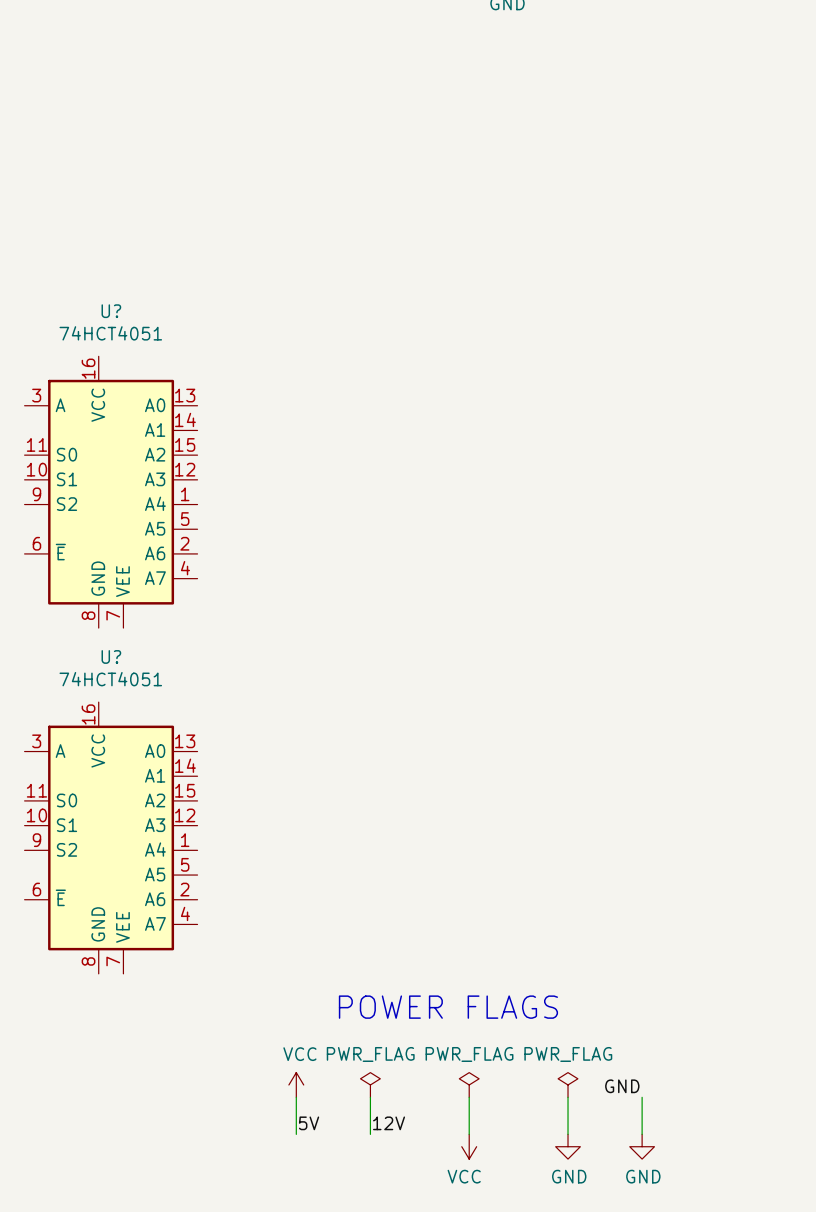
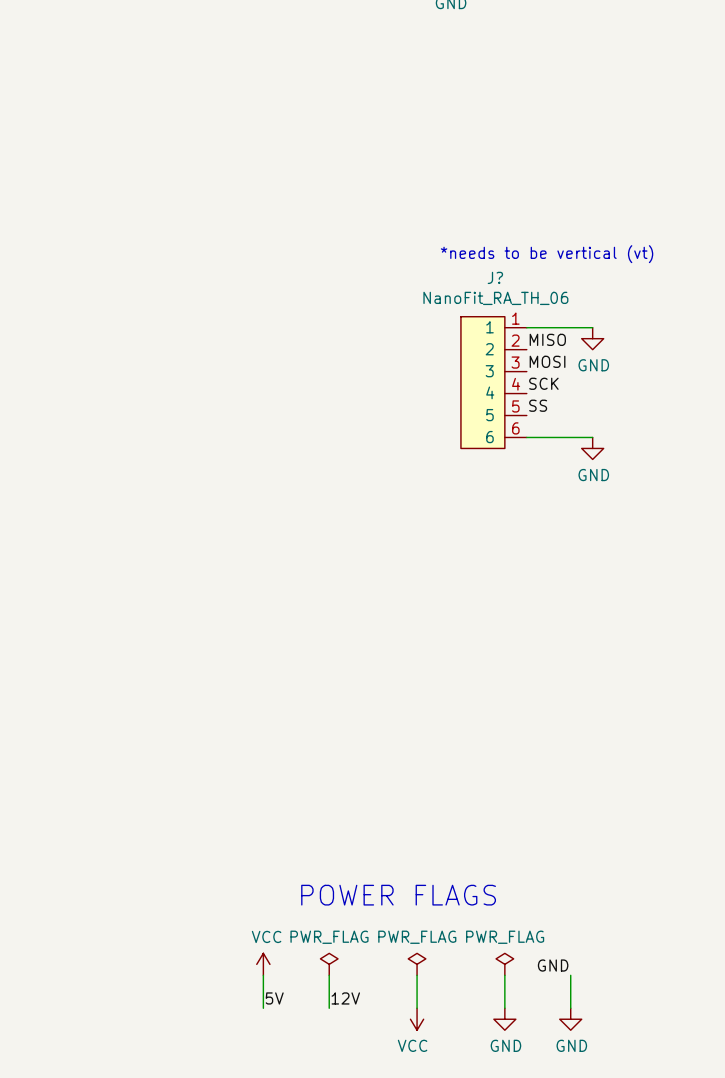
text: none -> *needs to be vertical (vt) (547, 254)
wire: none -> (526, 327) (592, 327)
power symbol: none -> GND (592, 338)
label: none -> MISO (547, 339)
label: none -> MOSI (547, 361)
J?: none -> NanoFit_RA_TH_06 (493, 382)
label: none -> SCK (543, 383)
label: none -> SS (538, 405)
U?: 74HCT4051 (111, 492) -> none
wire: none -> (526, 437) (592, 437)
power symbol: none -> GND (592, 448)
U?: 74HCT4051 (111, 837) -> none

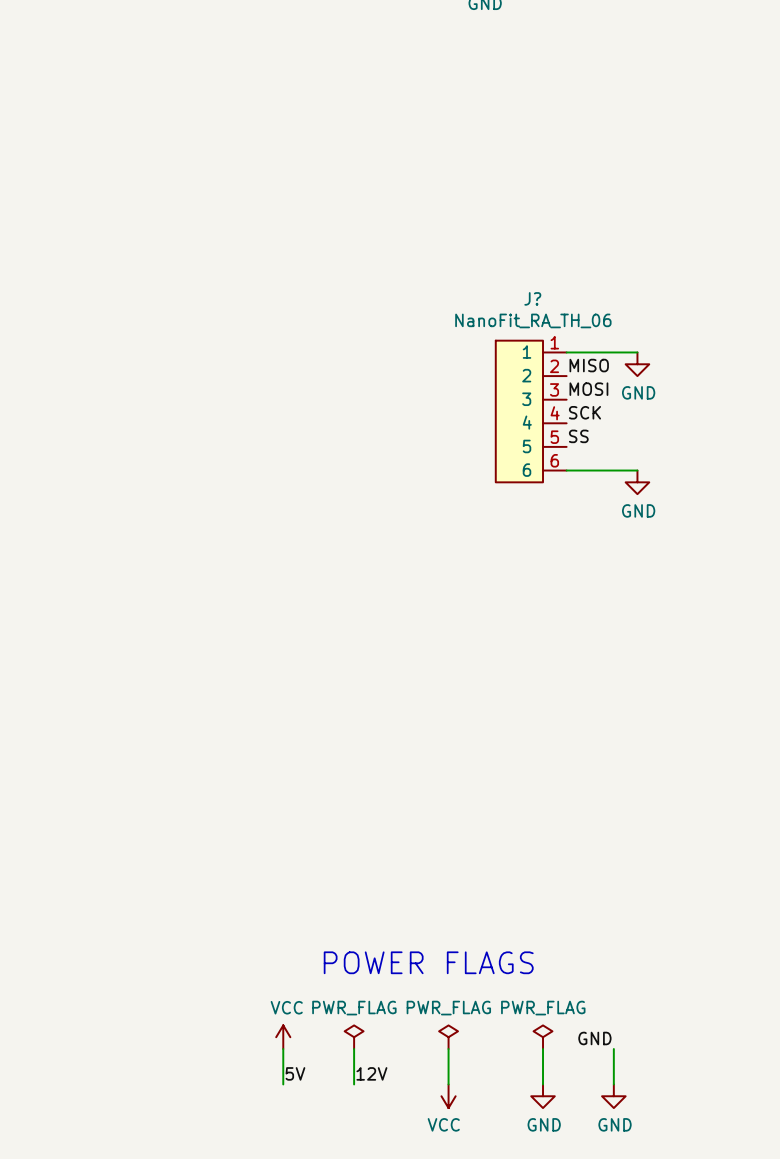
text: *needs to be vertical (vt) (547, 254) -> none

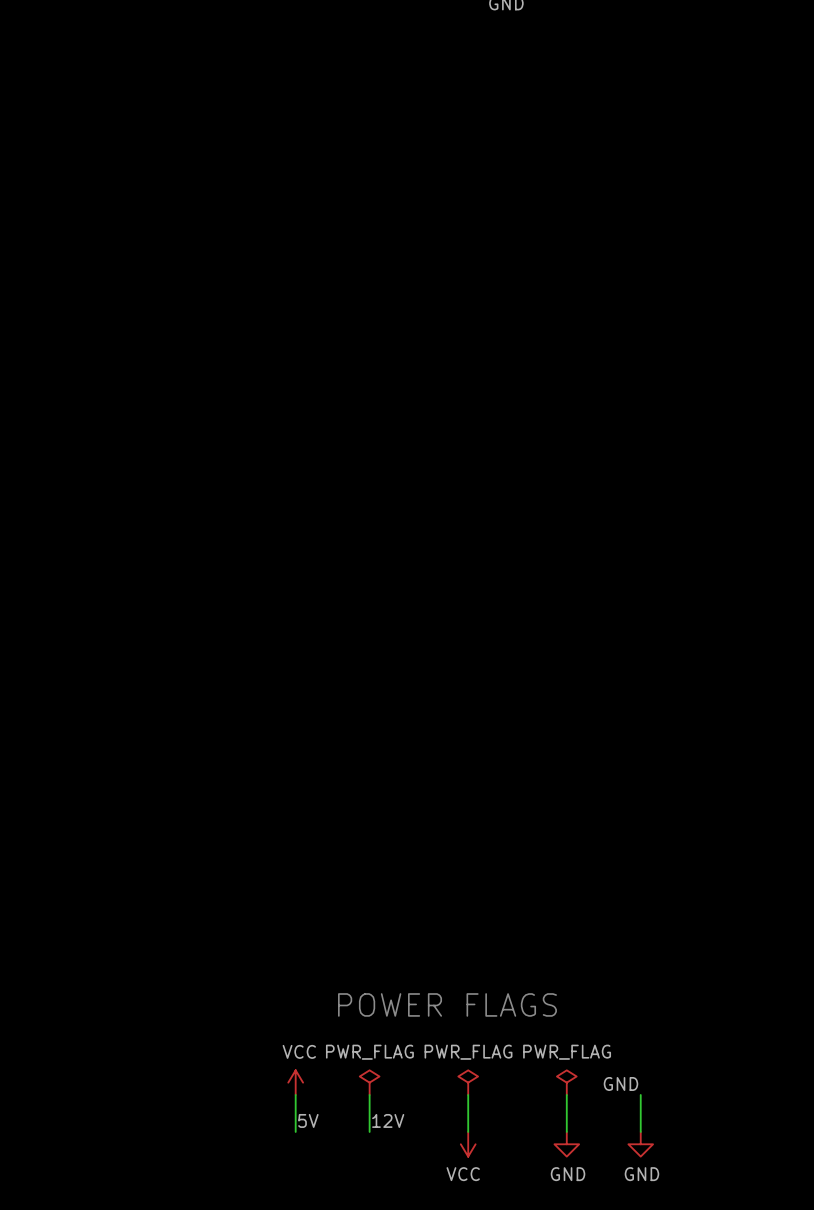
wire: (566, 352) (637, 352) -> none
power symbol: GND (637, 364) -> none
label: MISO (589, 365) -> none
label: MOSI (588, 389) -> none
J?: NanoFit_RA_TH_06 (531, 411) -> none
label: SCK (584, 412) -> none
label: SS (578, 436) -> none
wire: (566, 470) (637, 470) -> none
power symbol: GND (637, 482) -> none

